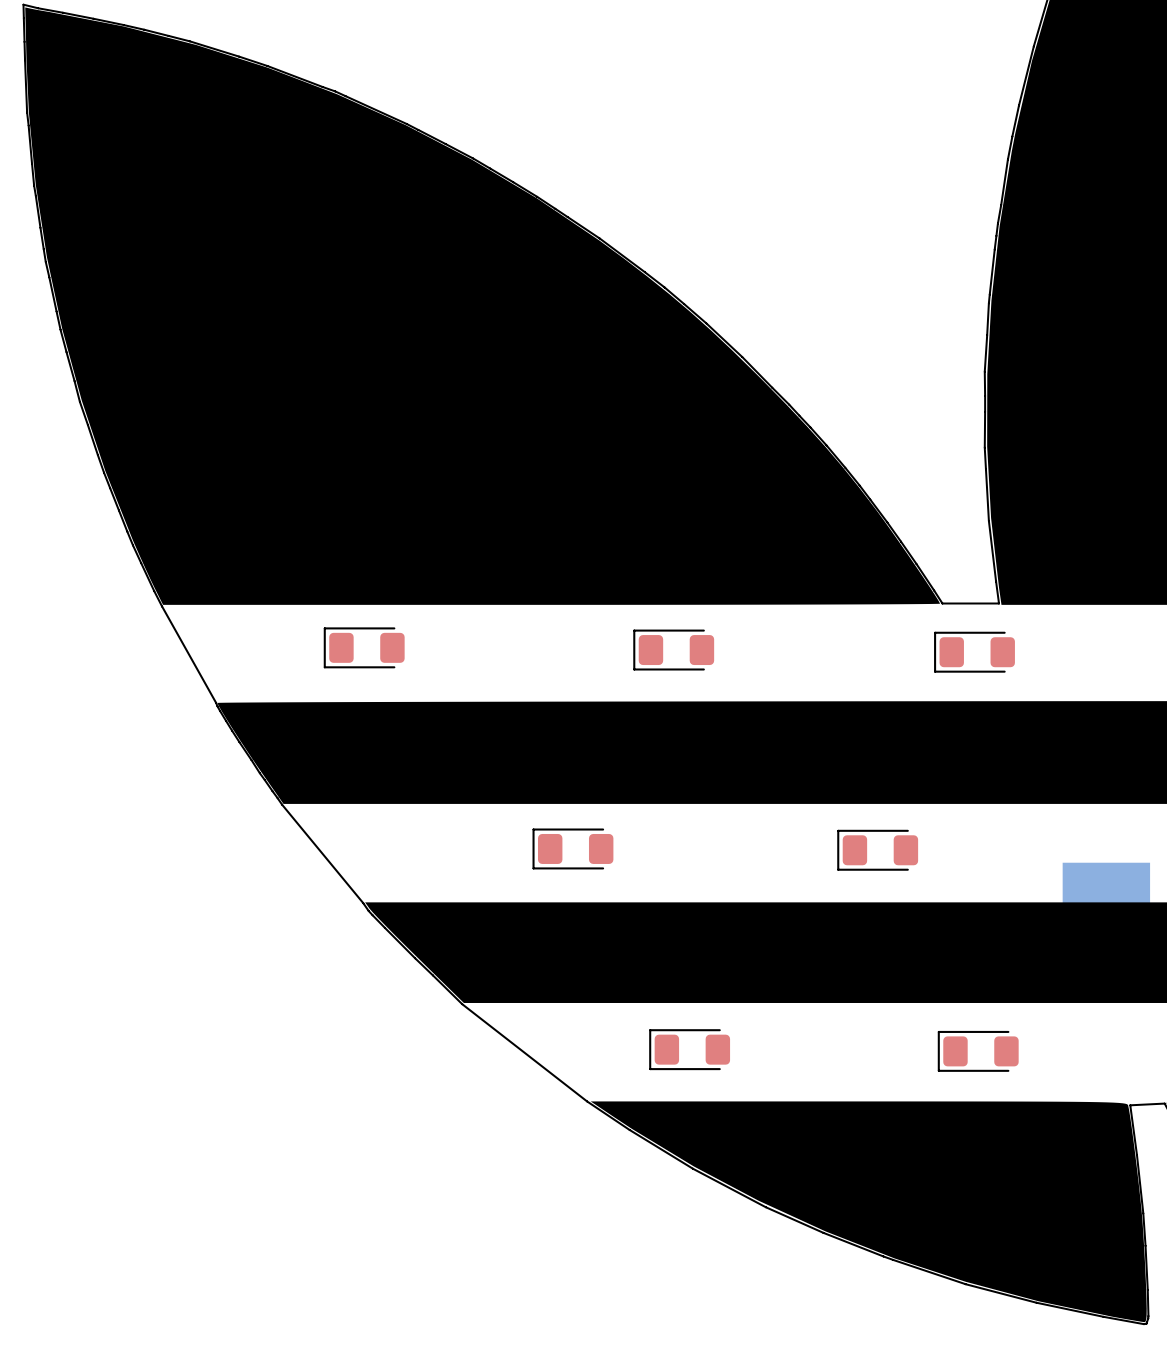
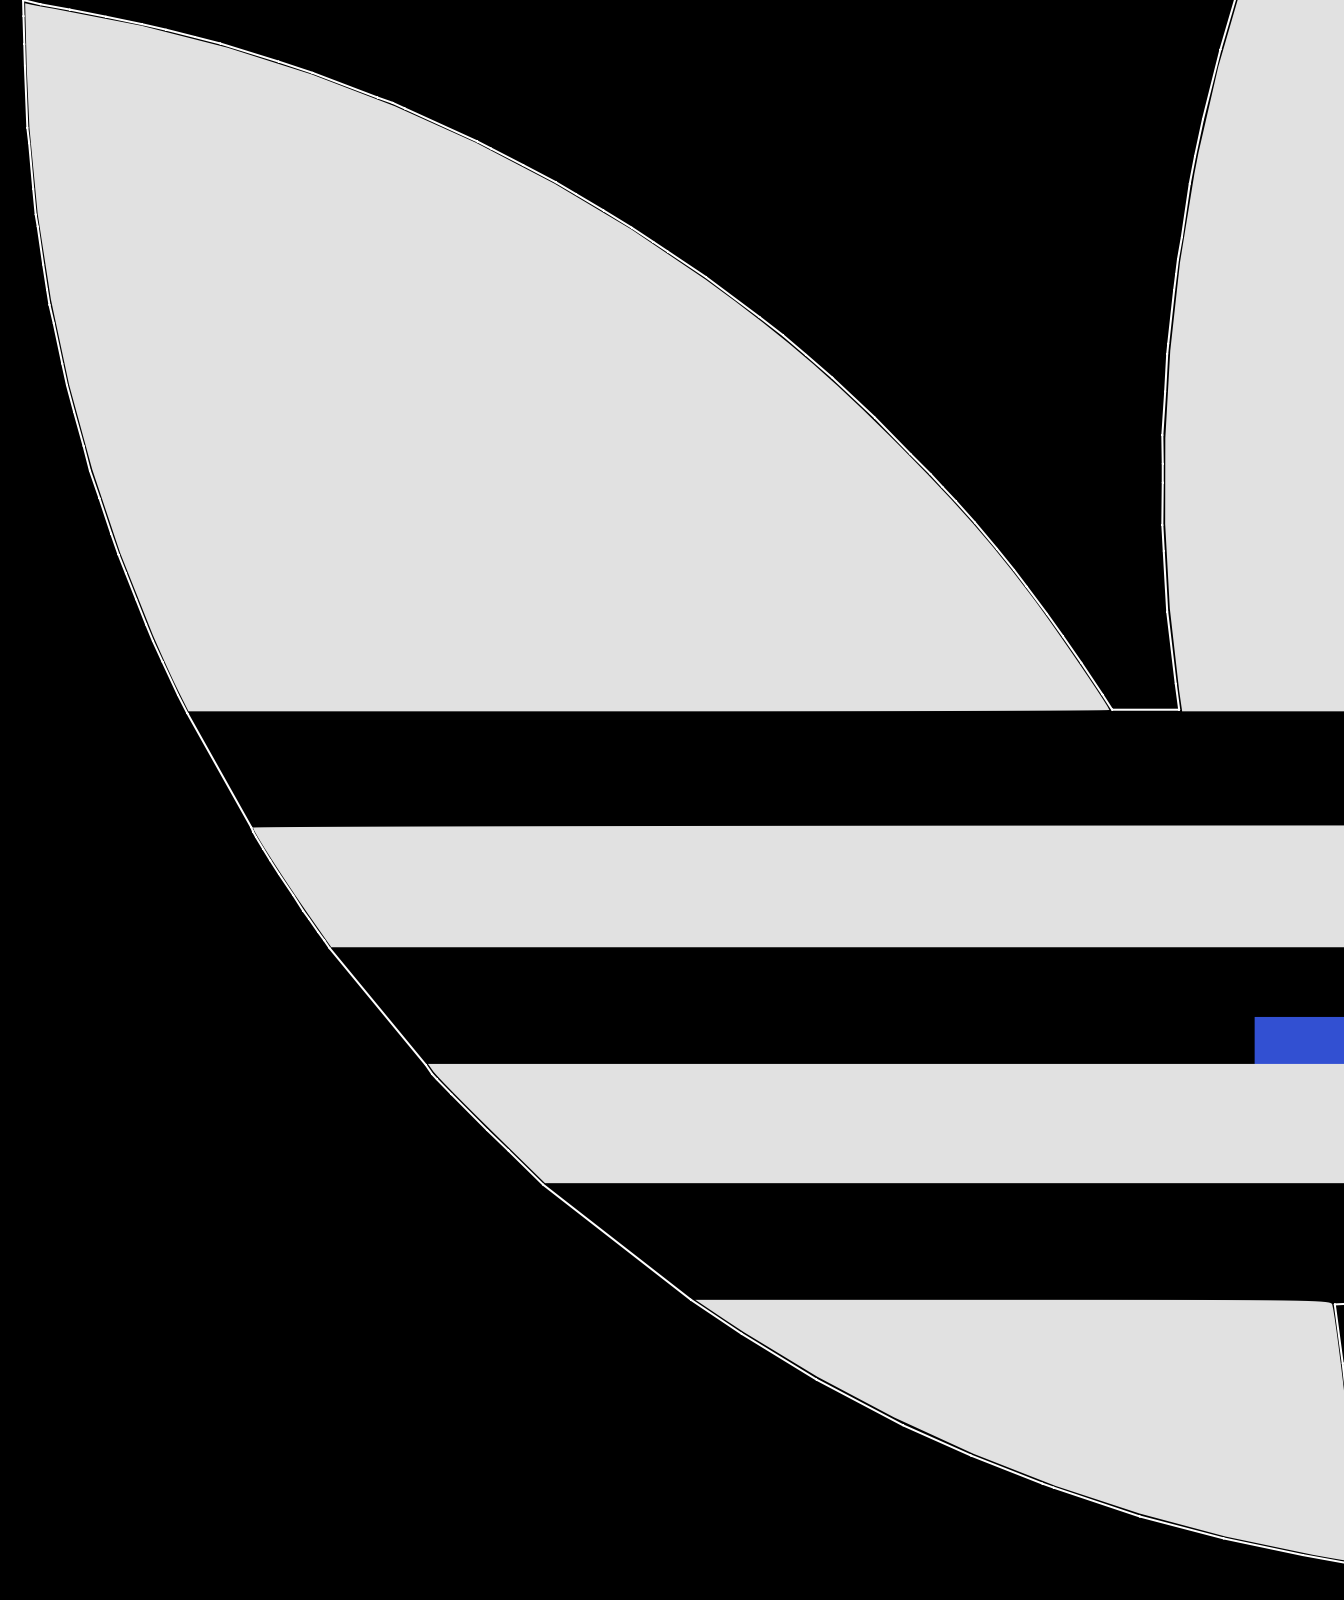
part: (364, 647) -> none
part: (673, 650) -> none
part: (974, 652) -> none
part: (572, 848) -> none
part: (877, 850) -> none
part: (689, 1049) -> none
part: (978, 1051) -> none

